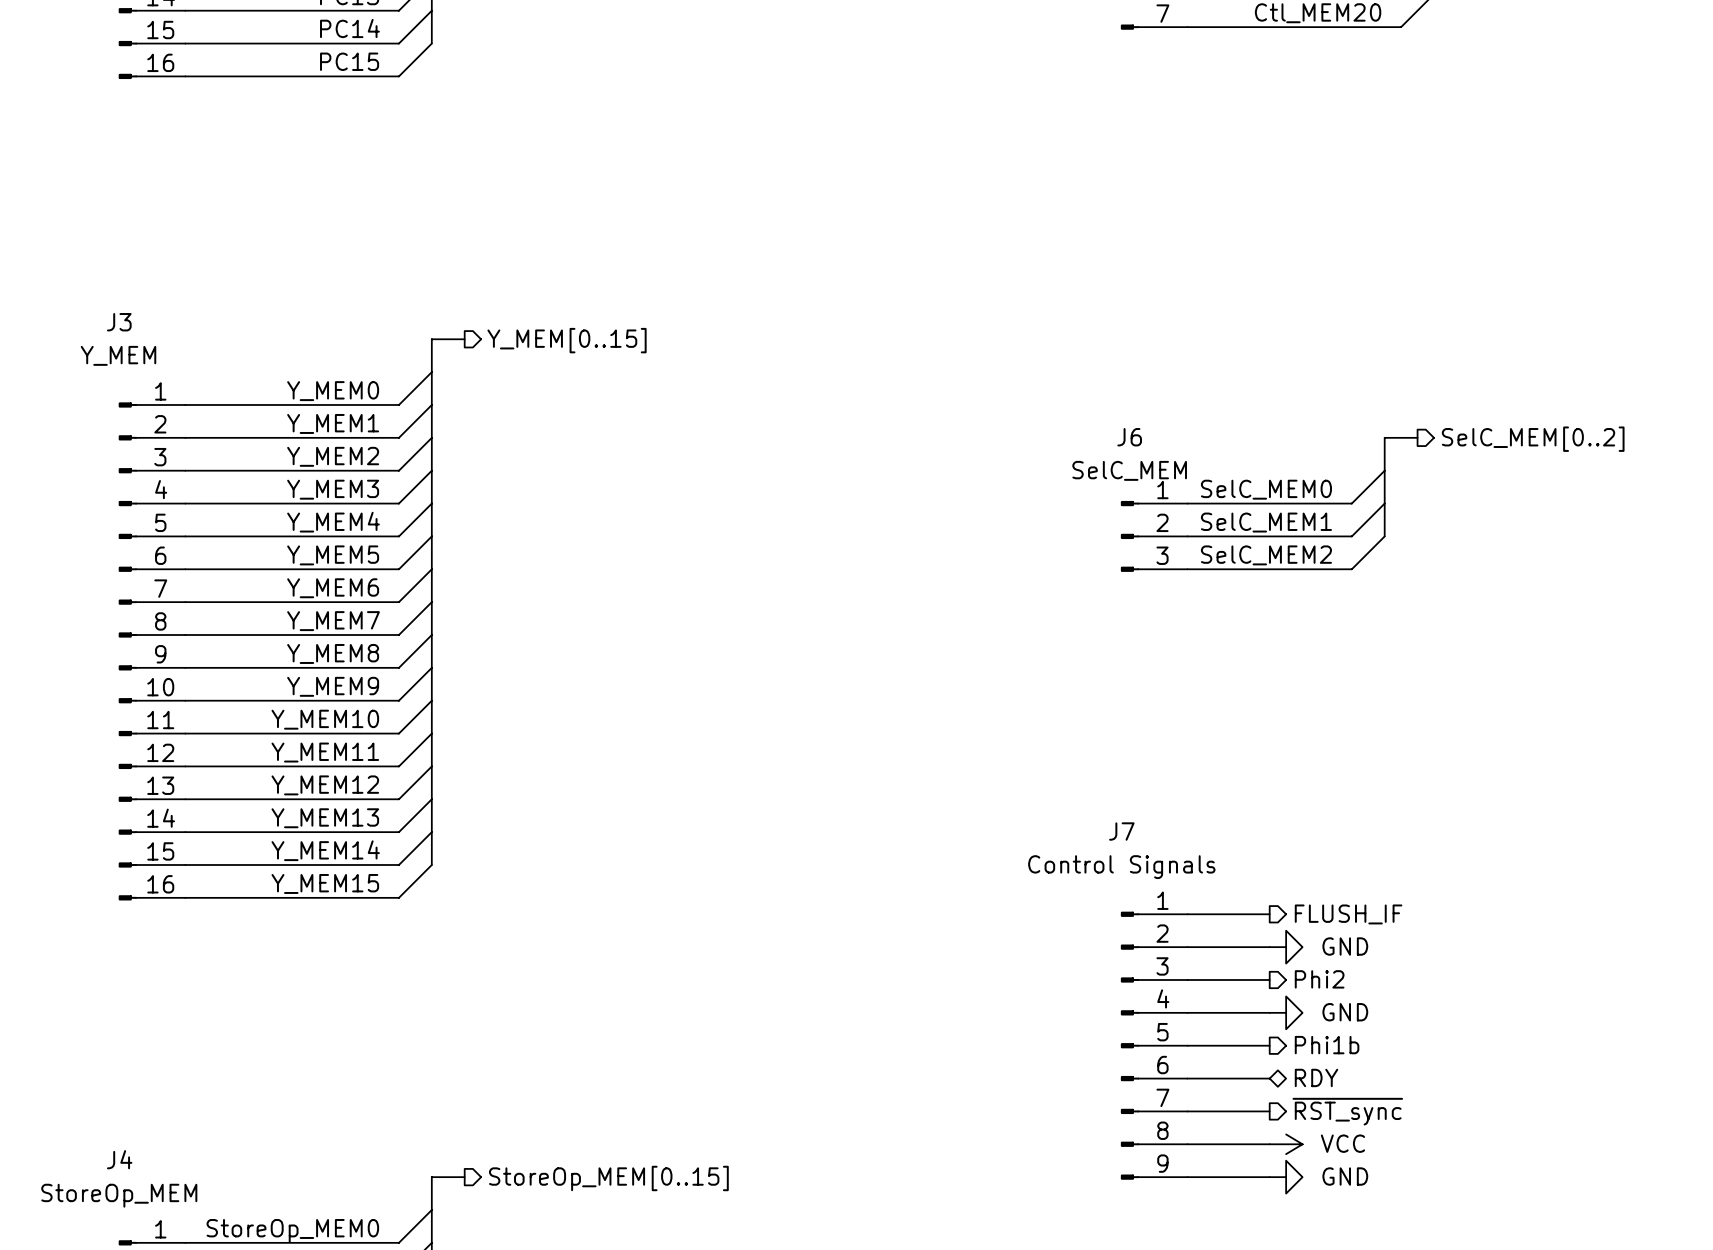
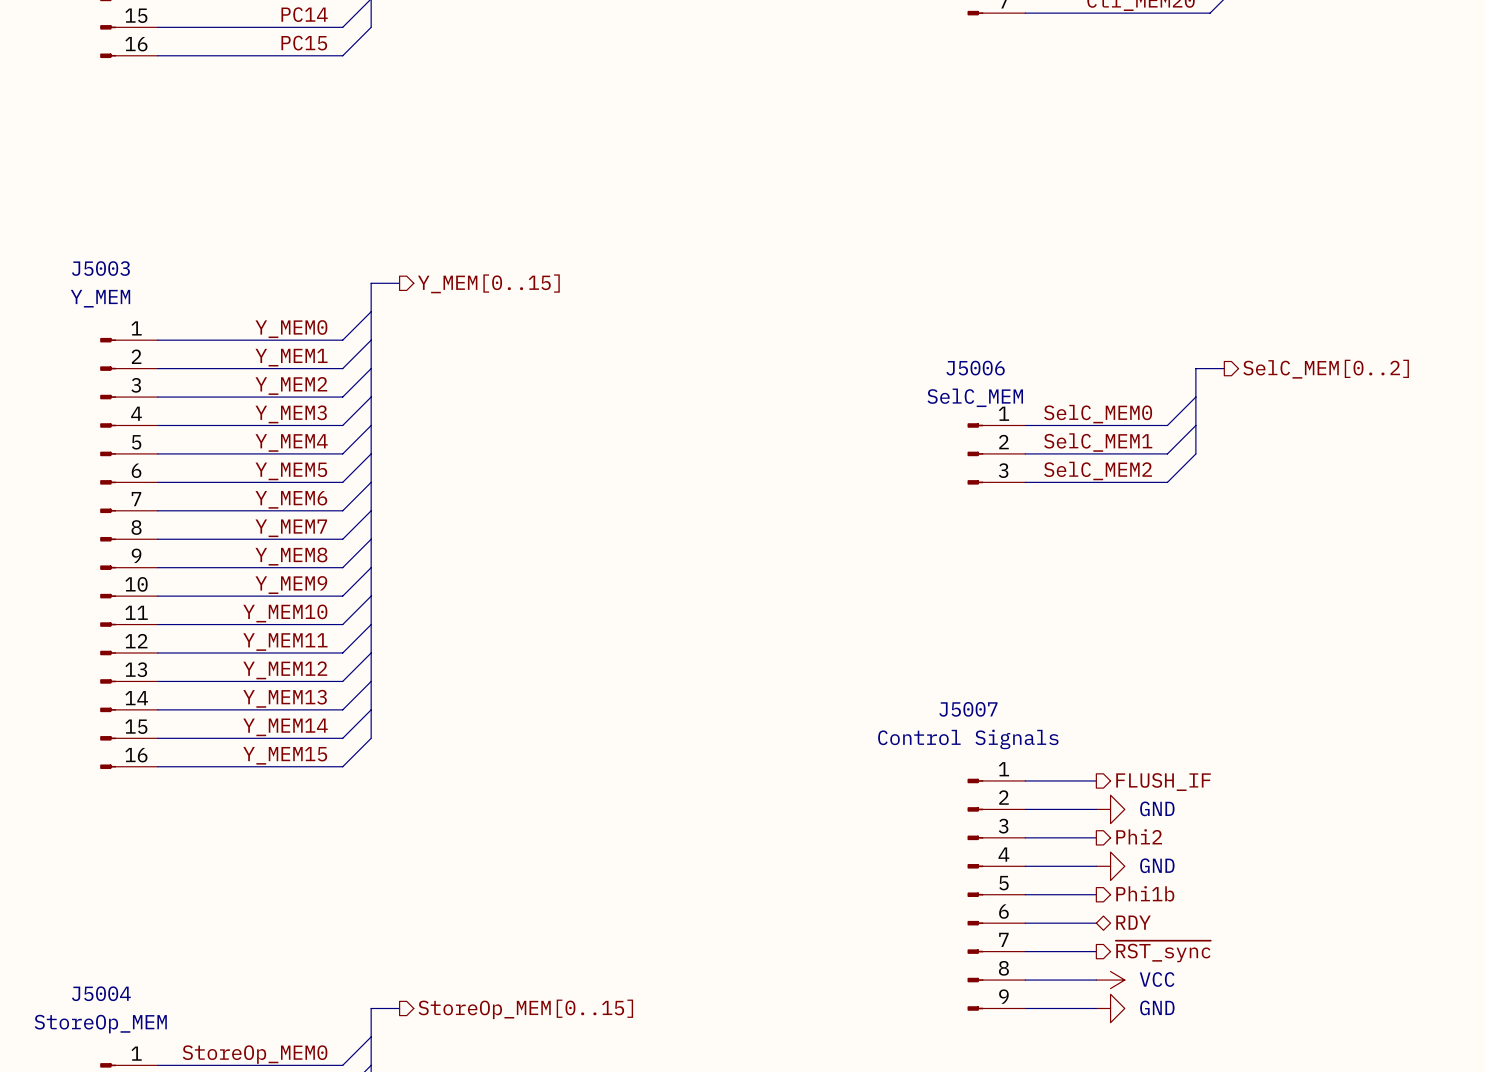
J3 name: J3 (119, 322) -> J5003 (100, 268)
J6 name: J6 (1129, 437) -> J5006 (975, 368)
J7 name: J7 (1121, 831) -> J5007 (968, 709)
J4 name: J4 (119, 1159) -> J5004 (101, 993)

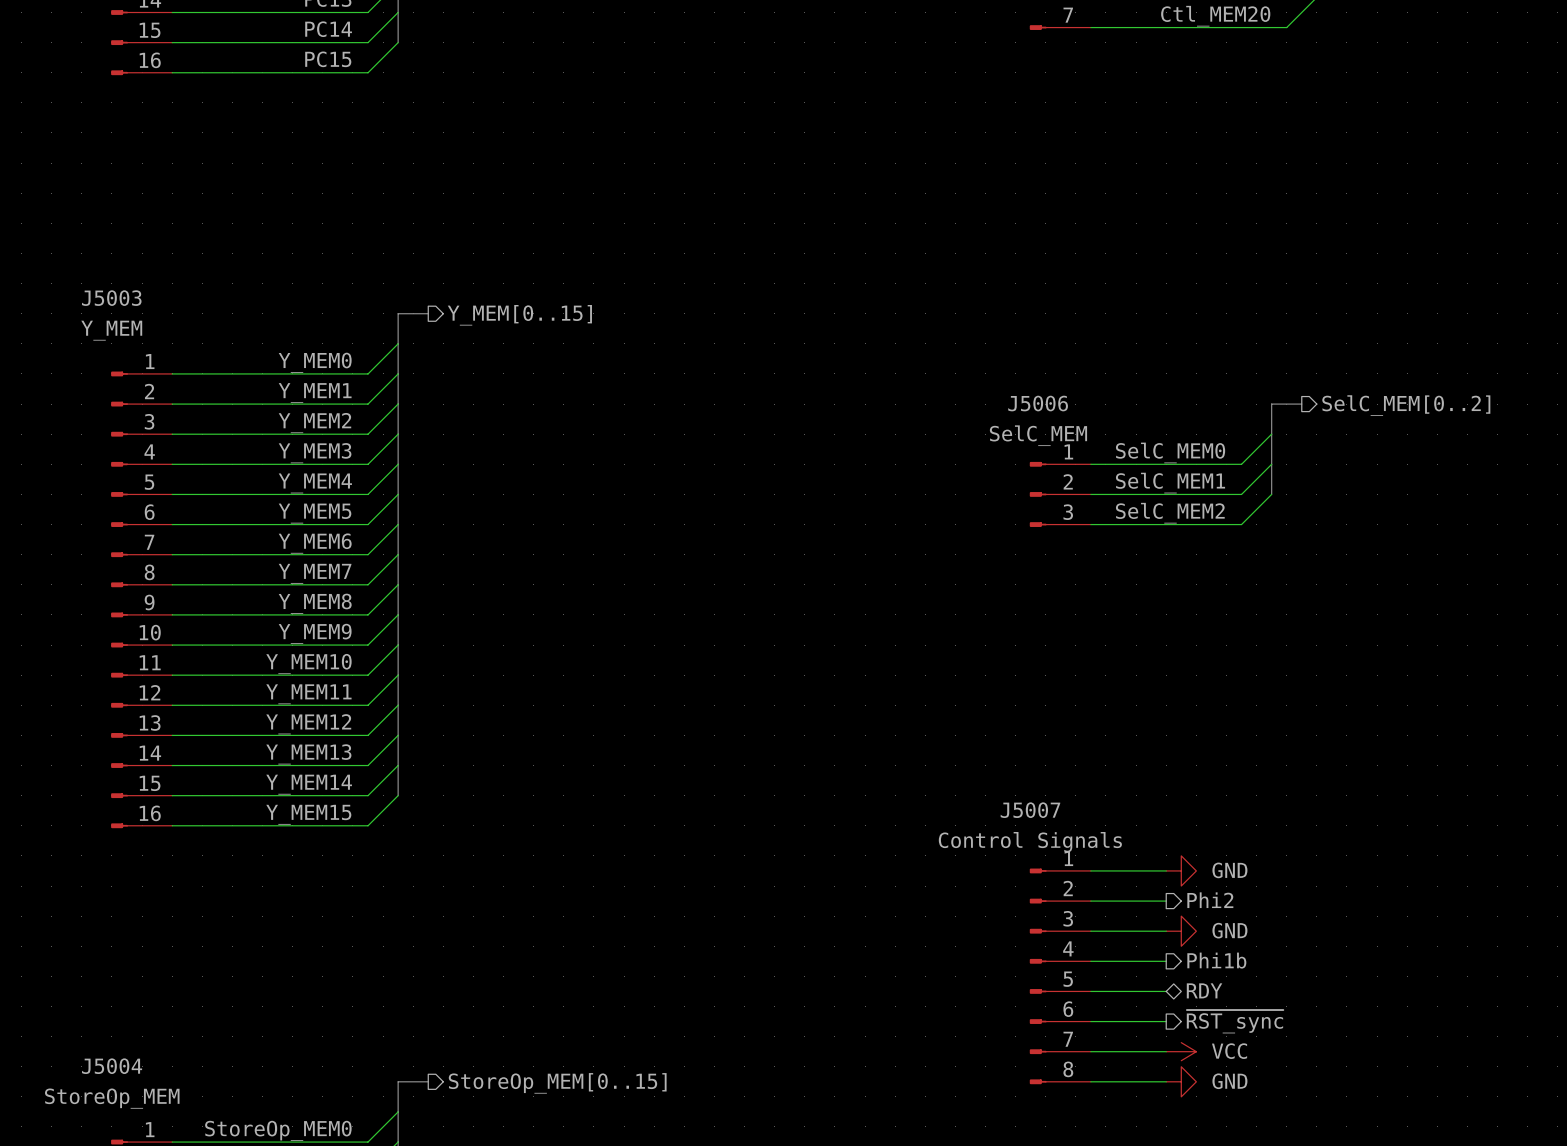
J5007 name position: J5007 (968, 709) -> J5007 (1030, 810)
J5007 value position: Control Signals (968, 739) -> Control Signals (1030, 842)
J5007 symbol: [967, 778, 1026, 1011] -> [1029, 868, 1091, 1085]
wire: (1025, 780) (1096, 780) -> none
hierarchical label: FLUSH_IF (1163, 782) -> none

